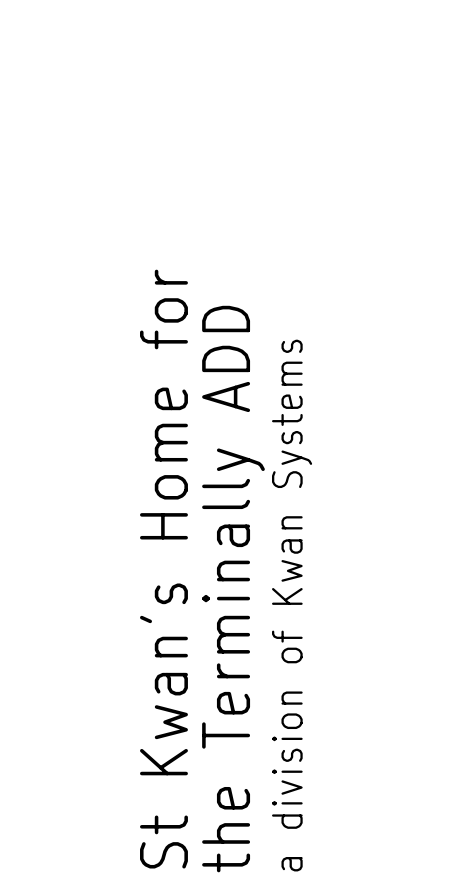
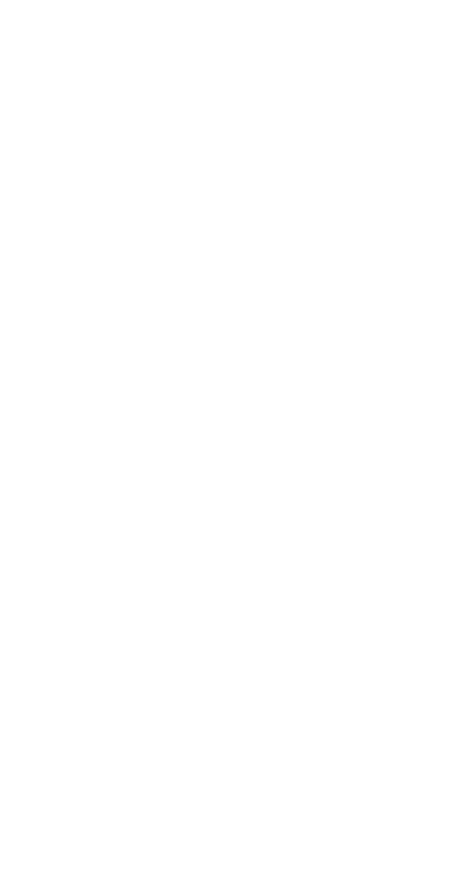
text: St Kwan's Home for (163, 569) -> none
text: the Terminally ADD (233, 589) -> none
text: a division of Kwan Systems (292, 605) -> none

